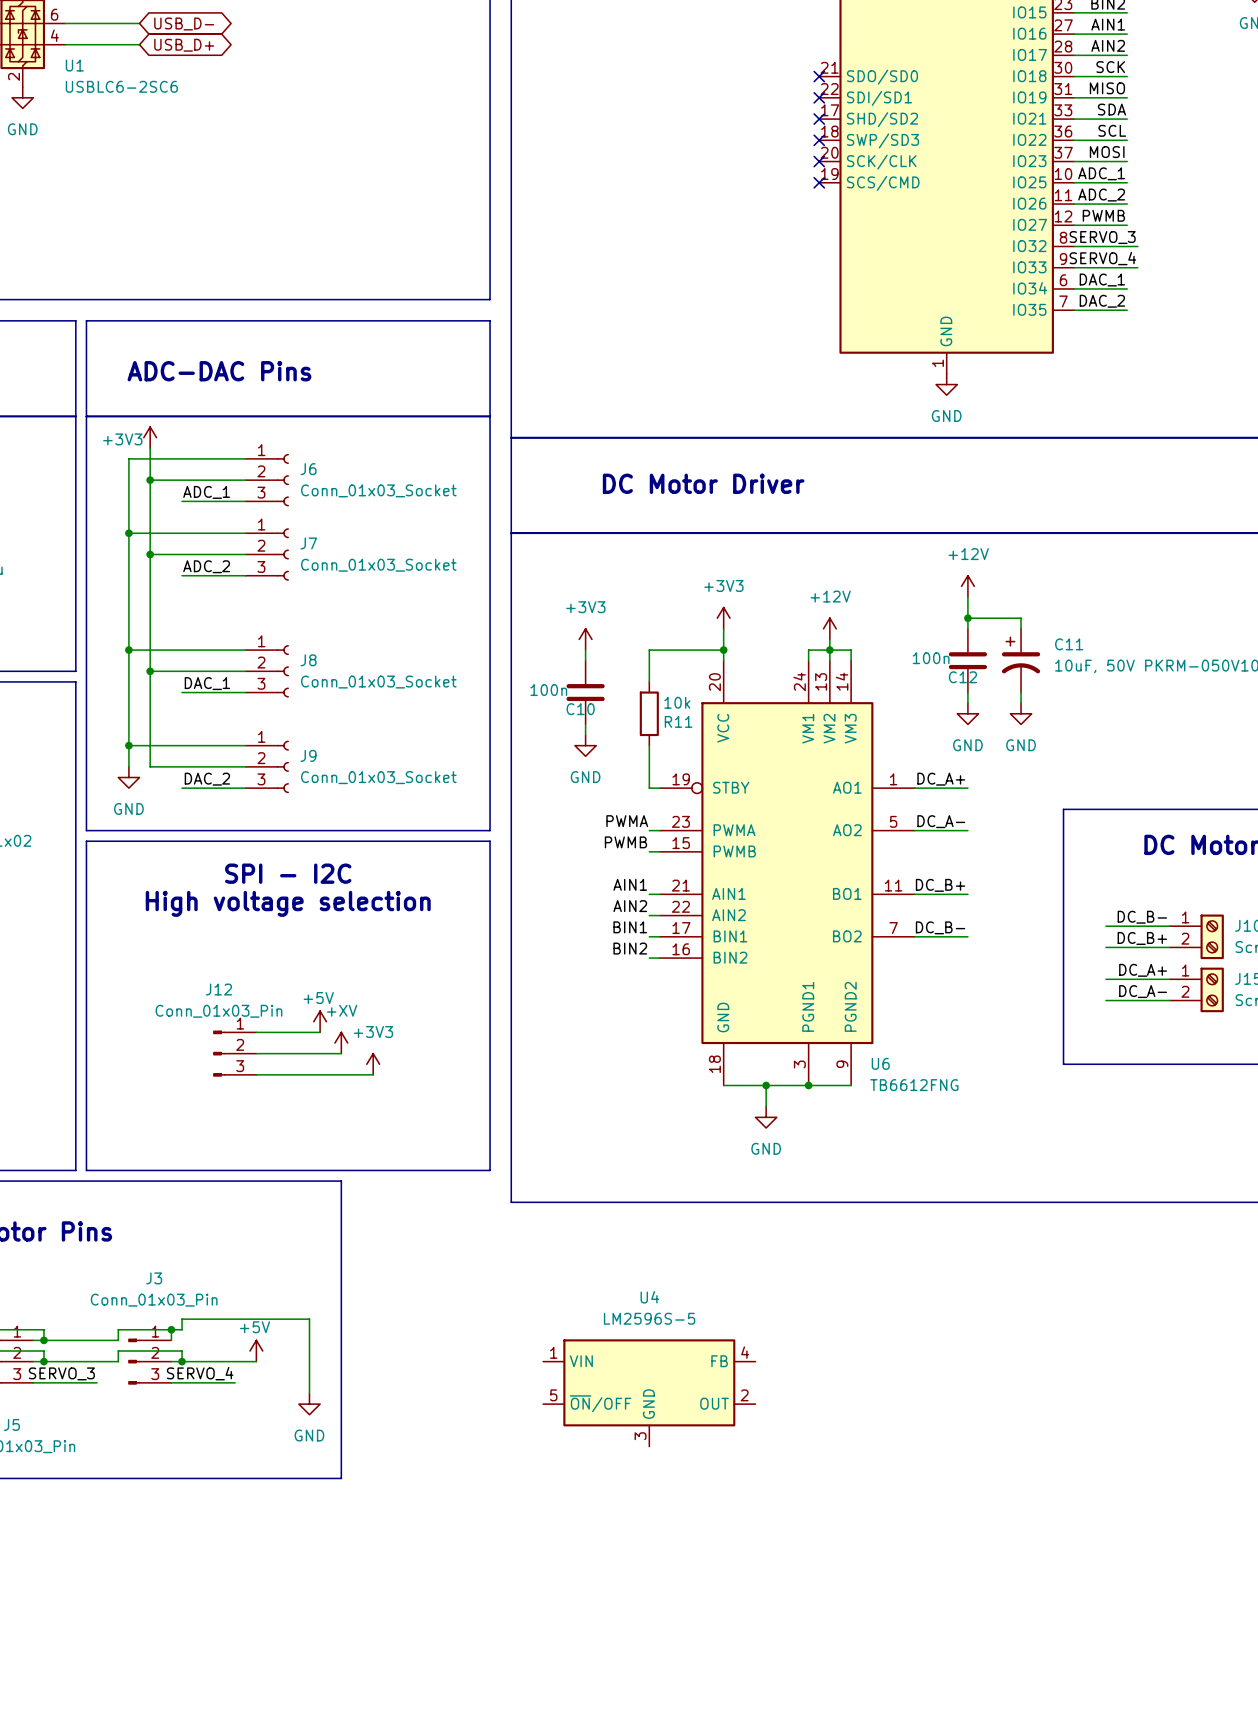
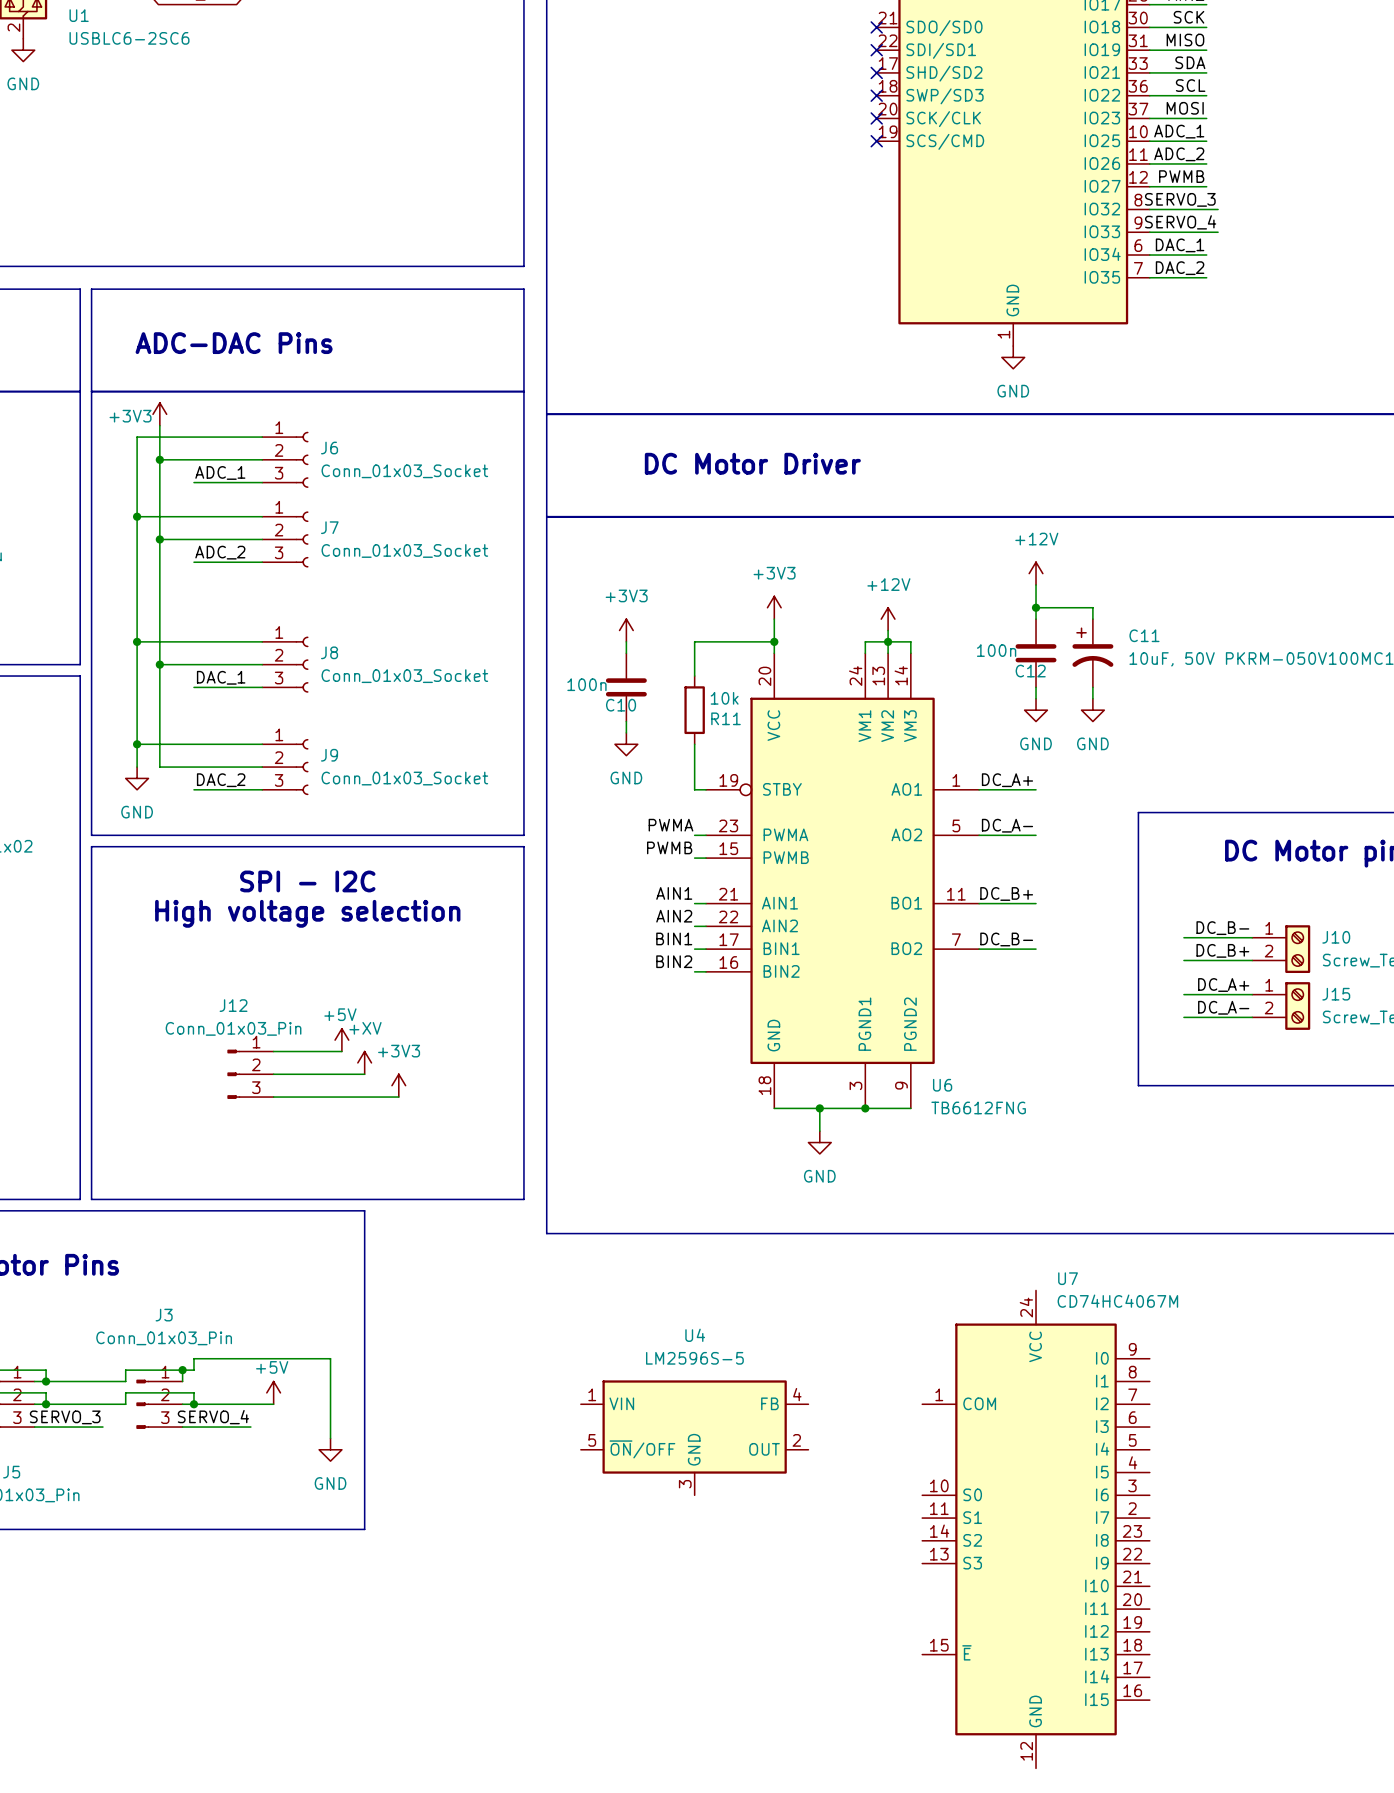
U7: none -> CD74HC4067M (1036, 1529)

